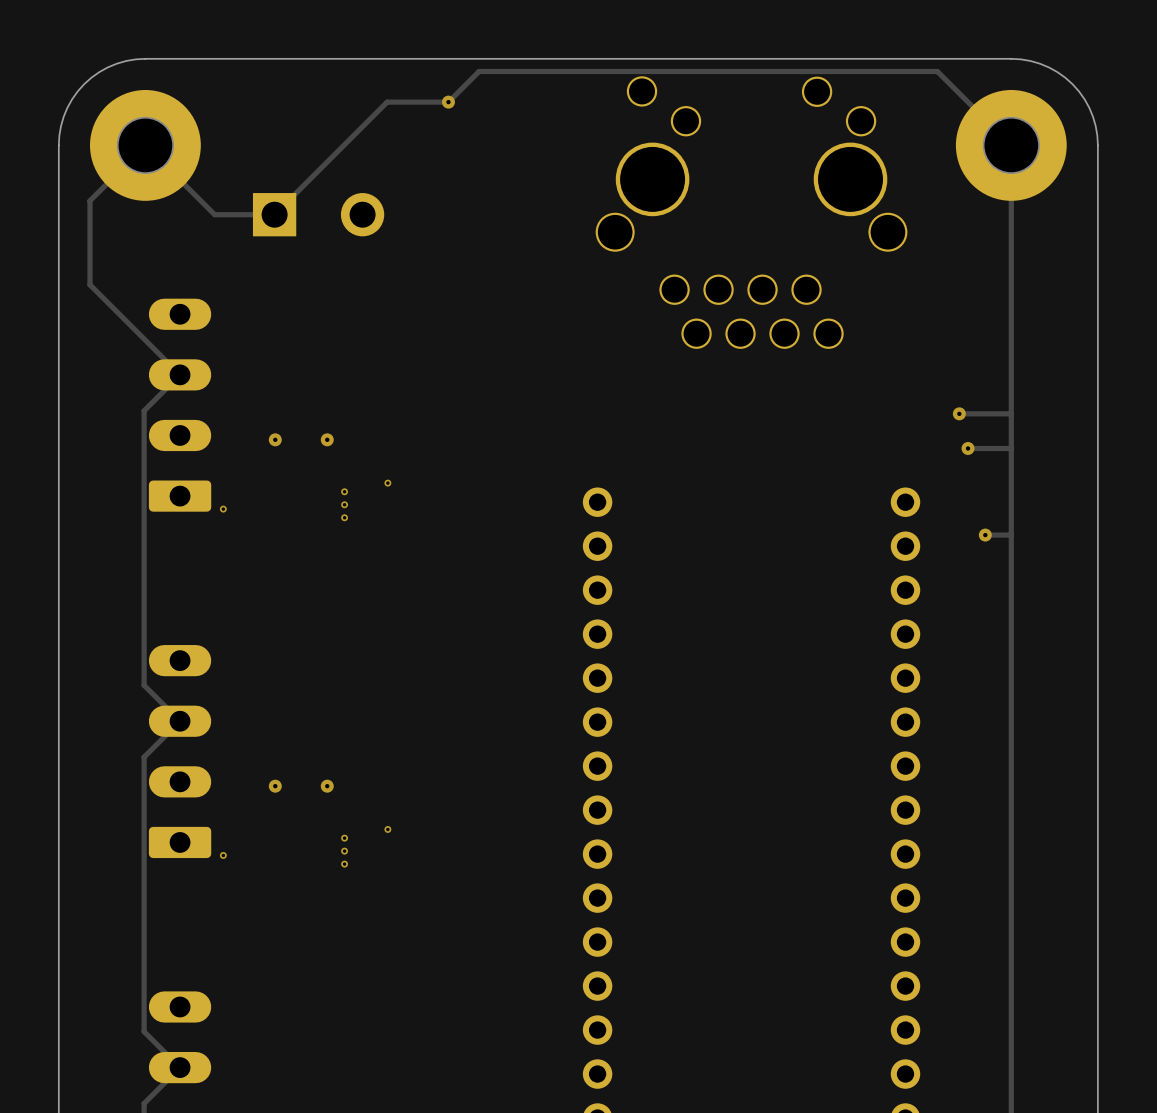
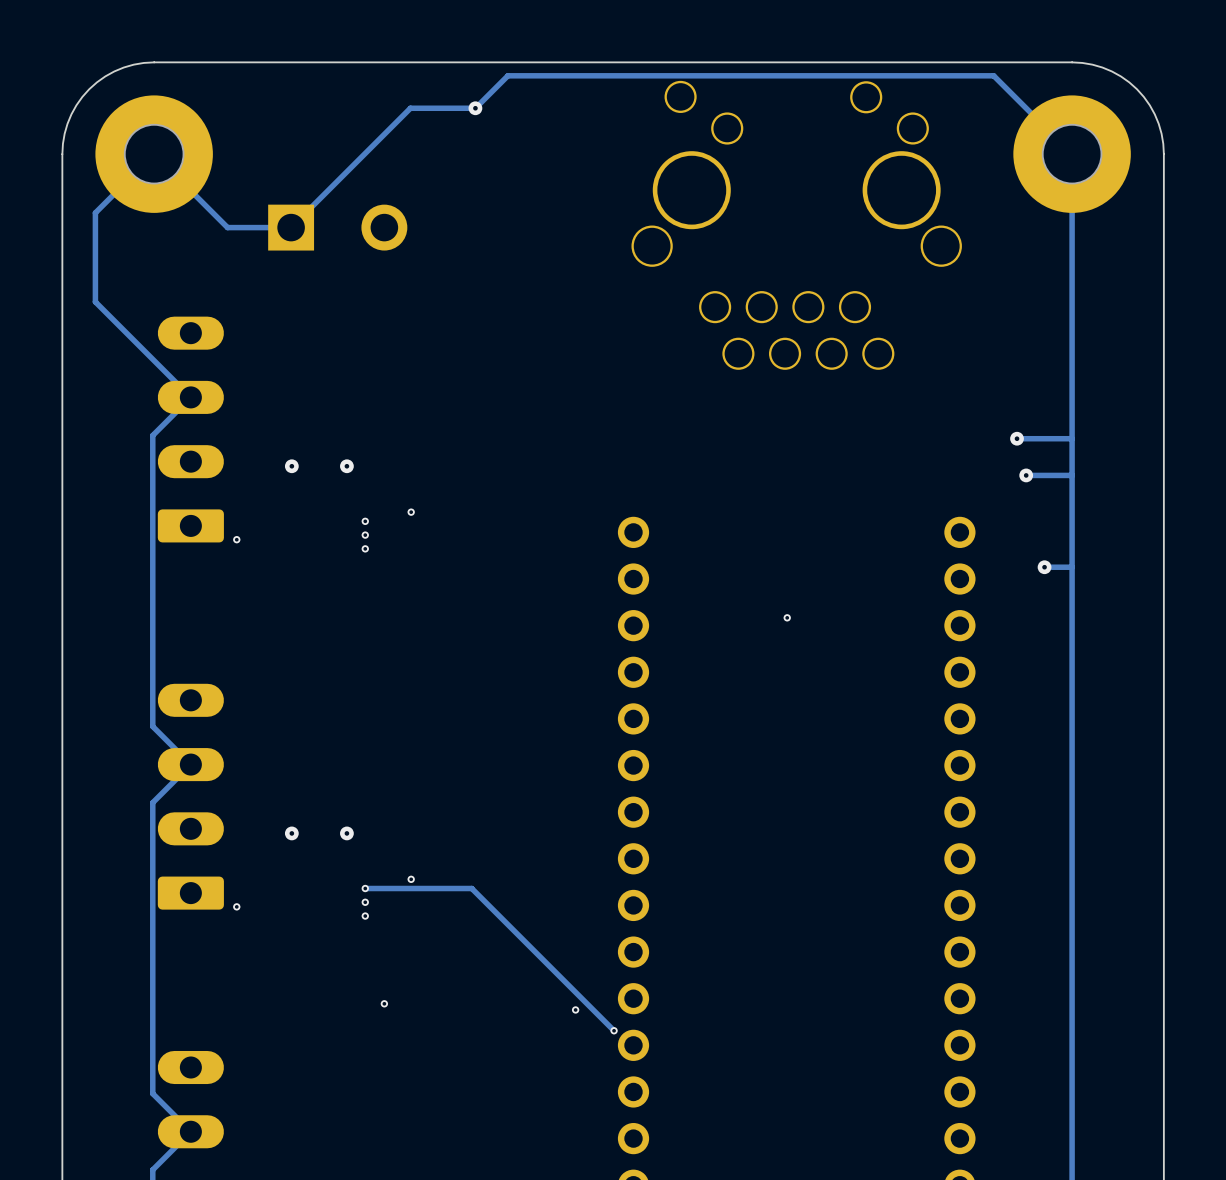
via: none -> (787, 617)
track: none -> (365, 888) (471, 888) (614, 1030)
via: none -> (384, 1003)
via: none -> (575, 1009)
via: none -> (614, 1030)

